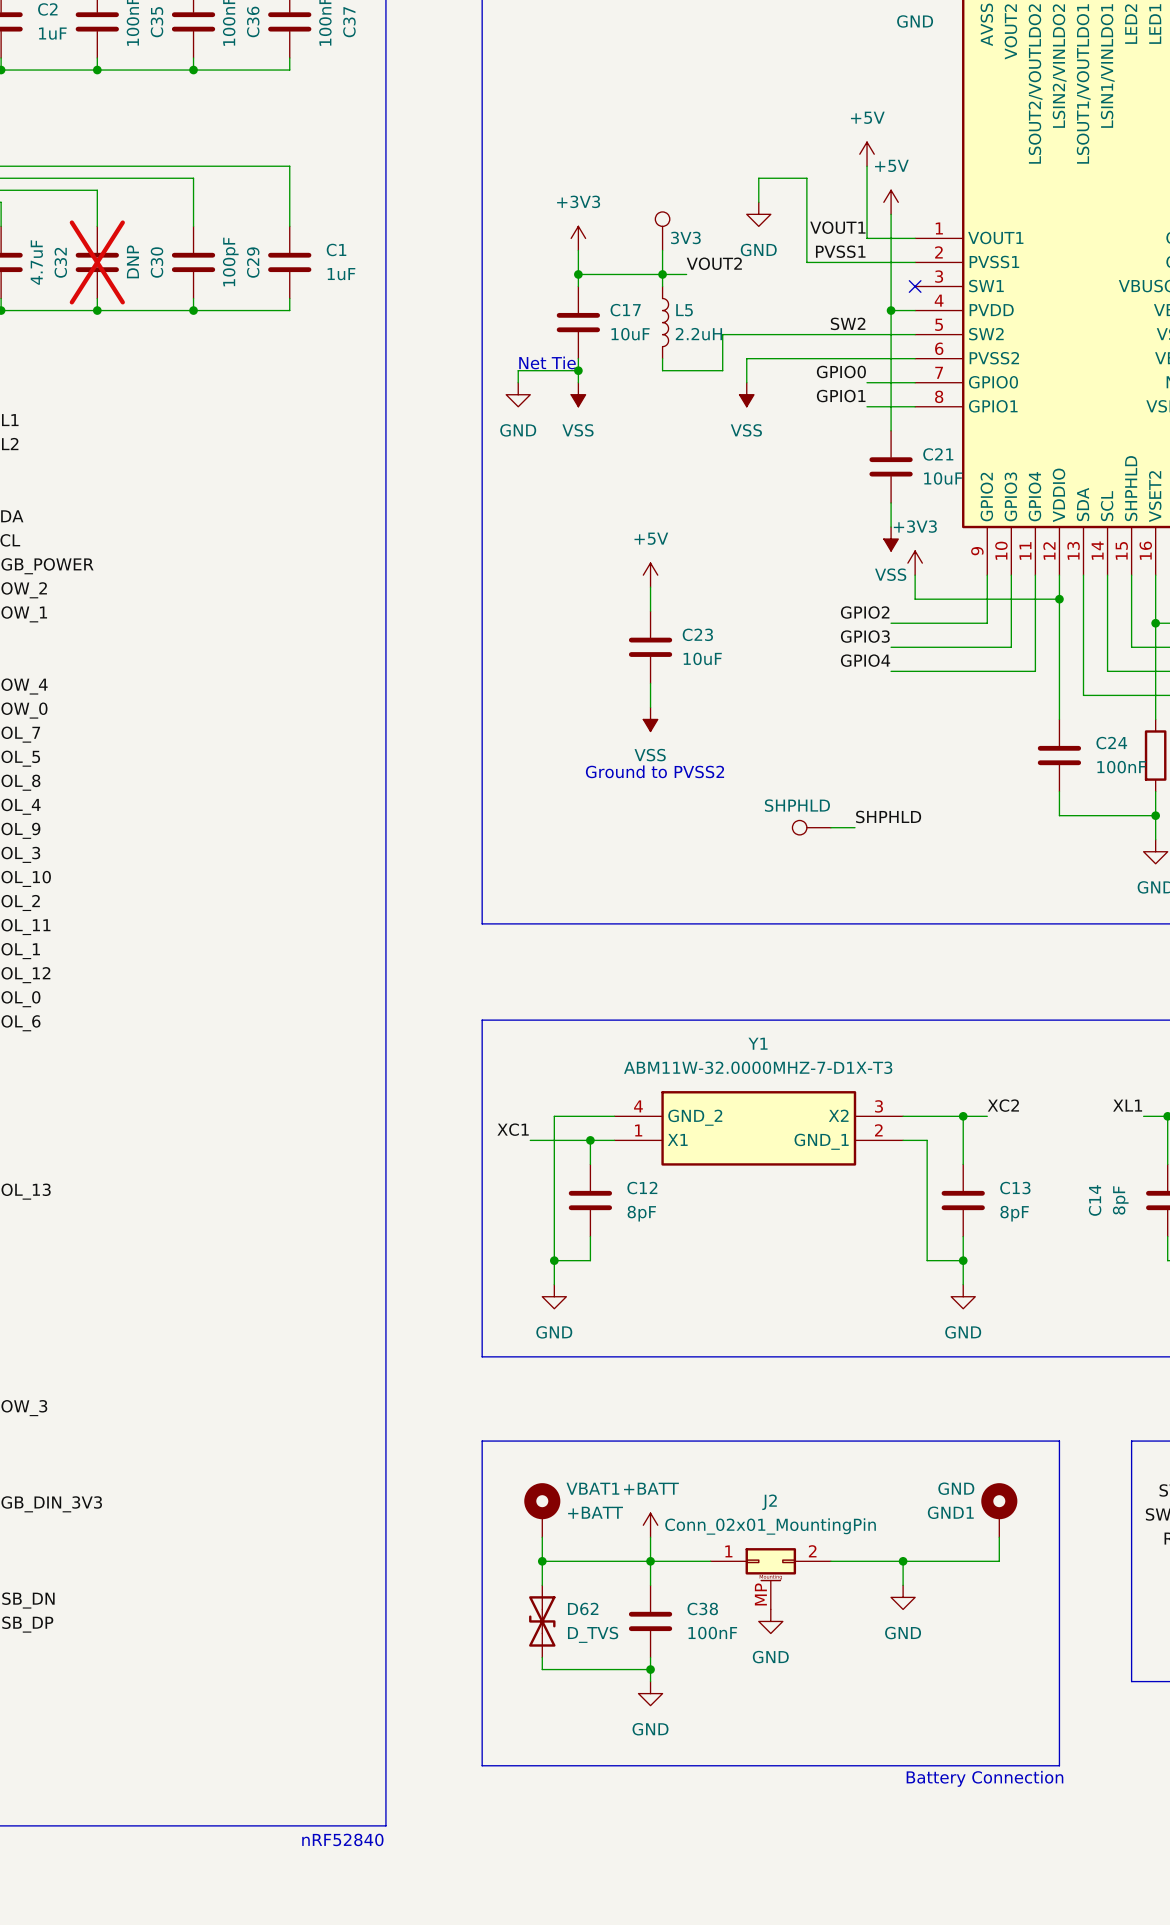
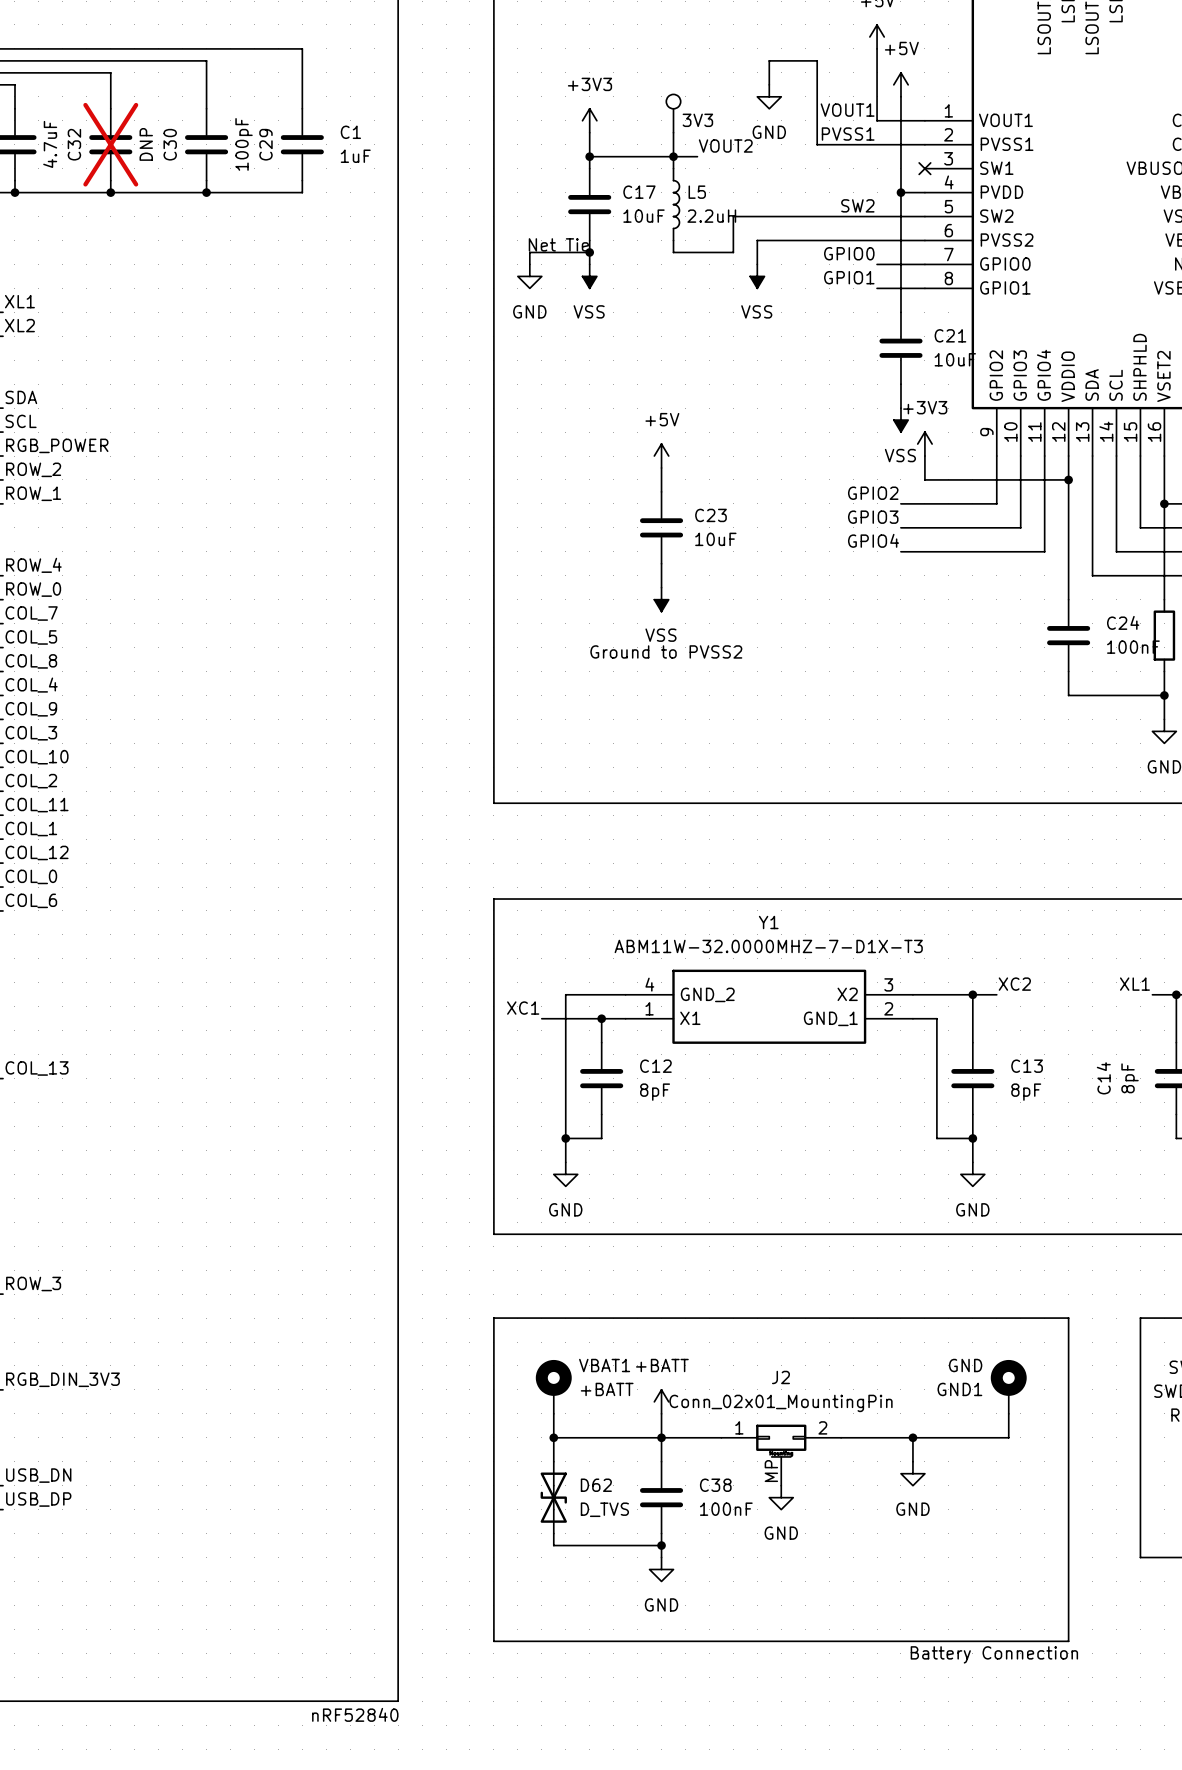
label: SHPHLD (888, 816) -> none
SHPHLD: (811, 827) -> none
wire: (830, 827) (854, 827) -> none

